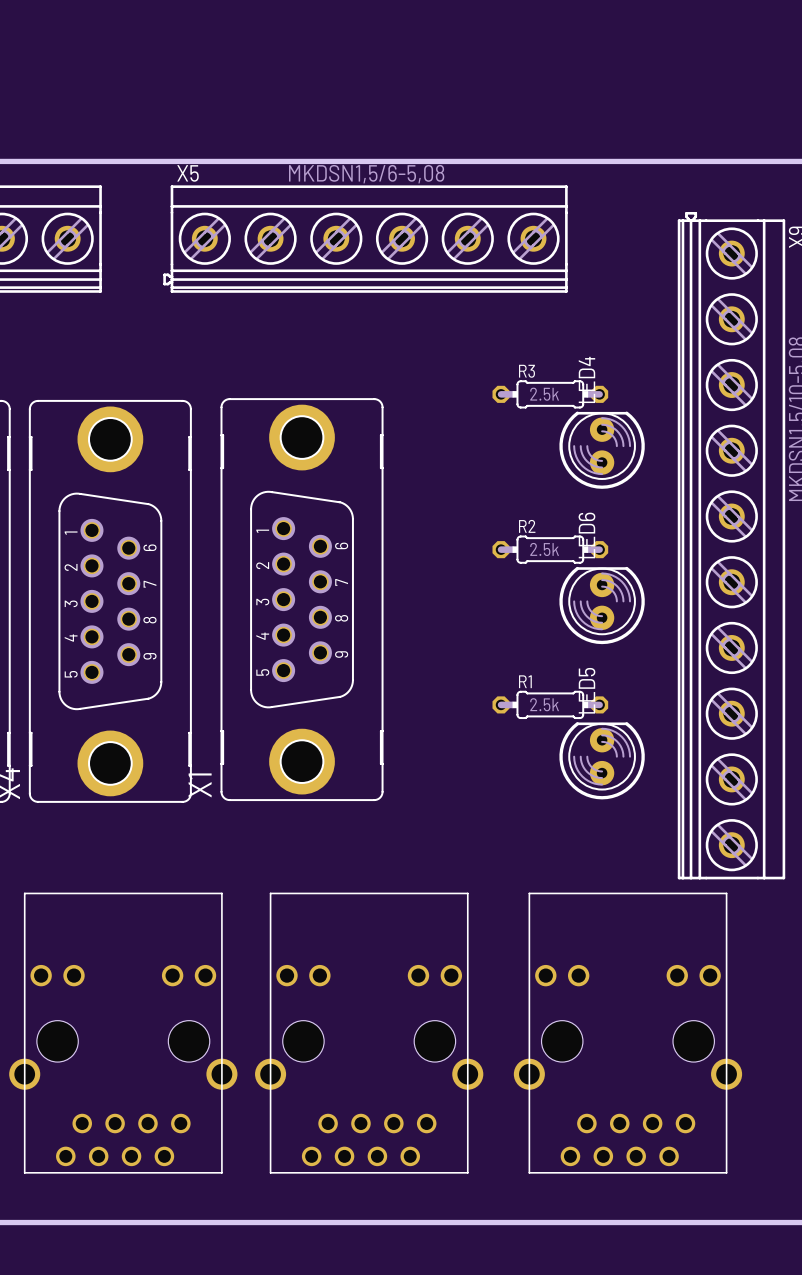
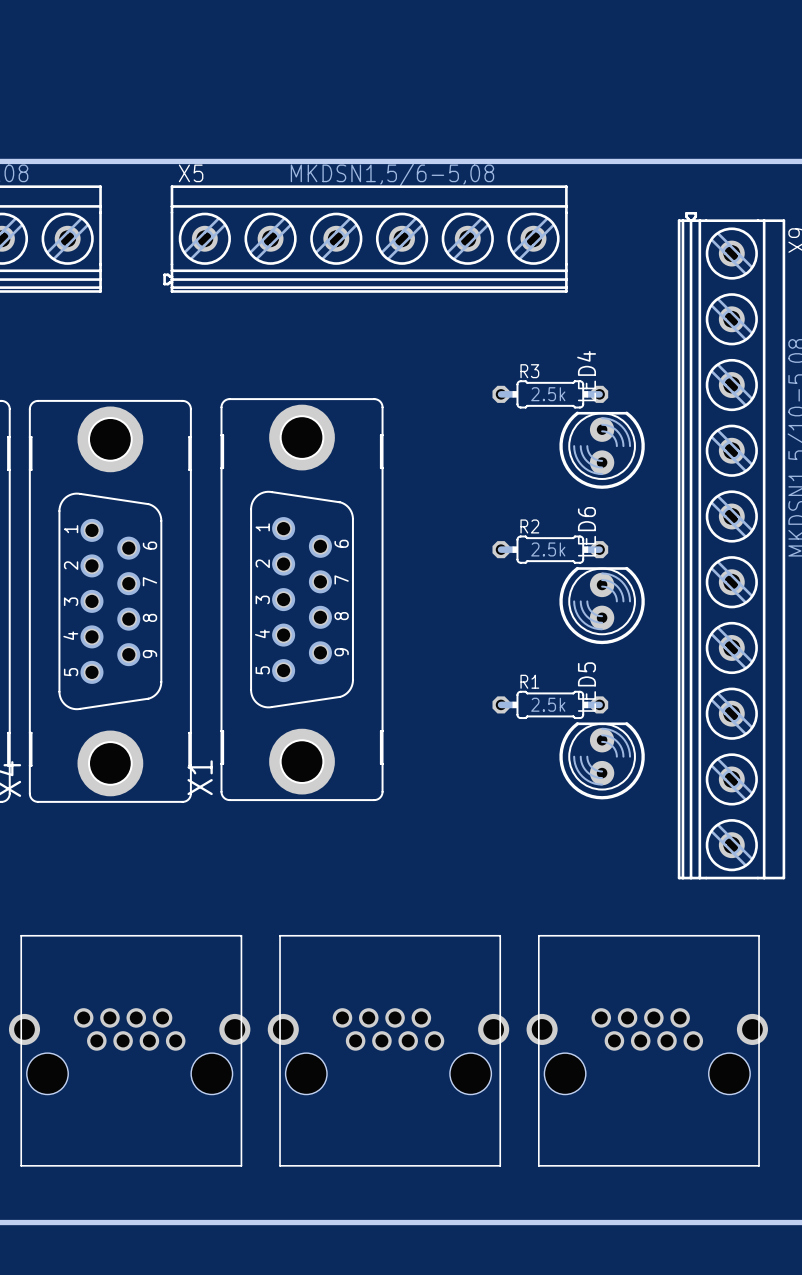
part: (123, 1033) -> none
part: (369, 1033) -> none
part: (627, 1033) -> none
part: none -> (129, 1050)
part: none -> (388, 1050)
part: none -> (647, 1050)

